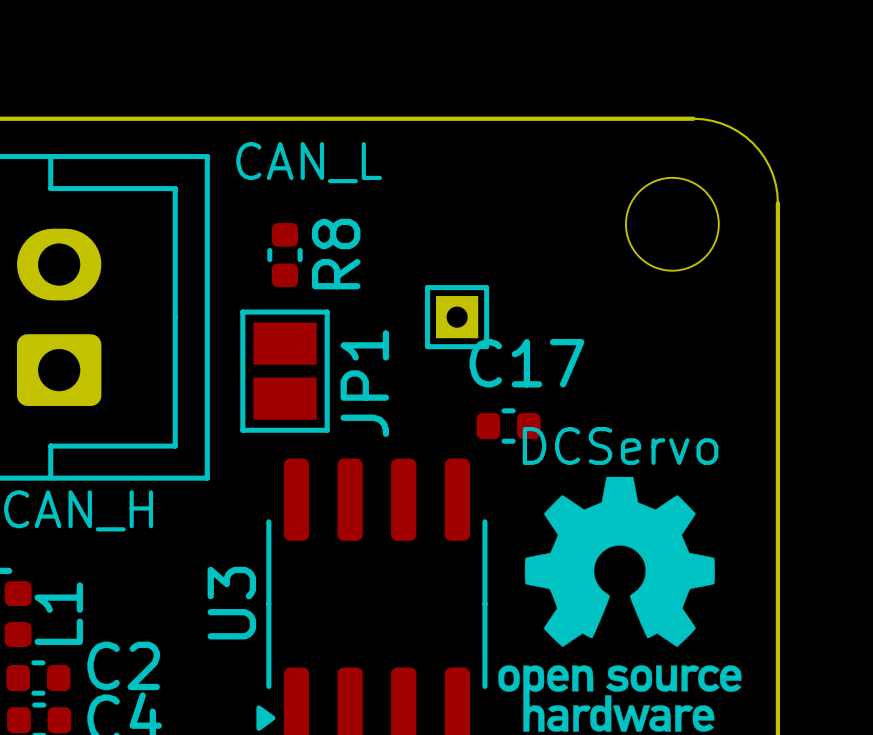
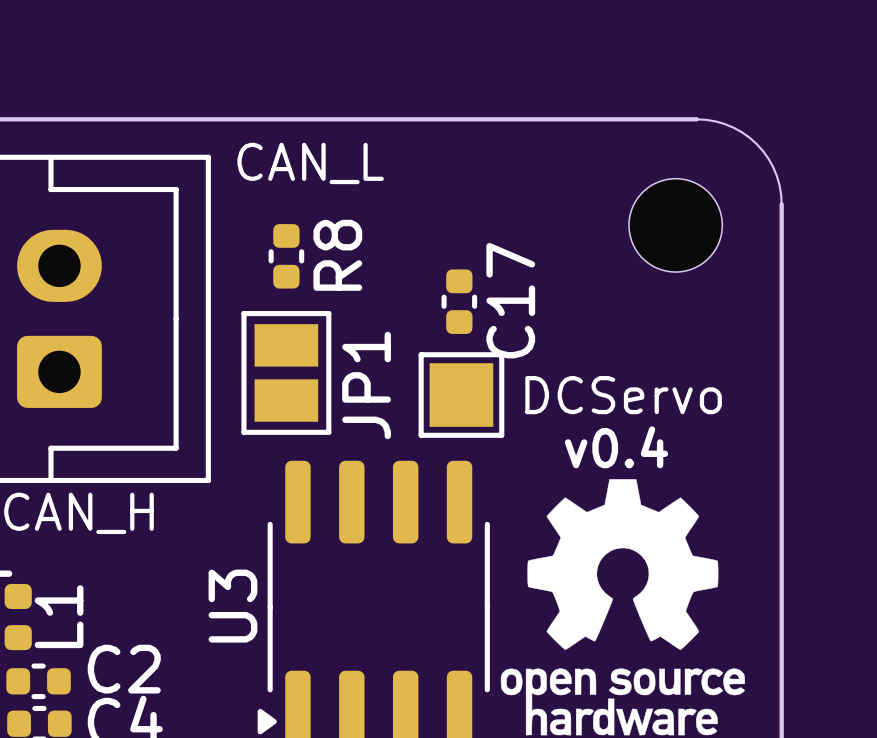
part: (457, 317) -> none
part: none -> (461, 395)
C17 rotation: 0° (508, 426) -> 90° clockwise (459, 301)
C17 position: (508, 426) -> (459, 301)
text: none -> v0.4 (616, 447)
text position: DCServo (620, 445) -> DCServo (623, 395)

